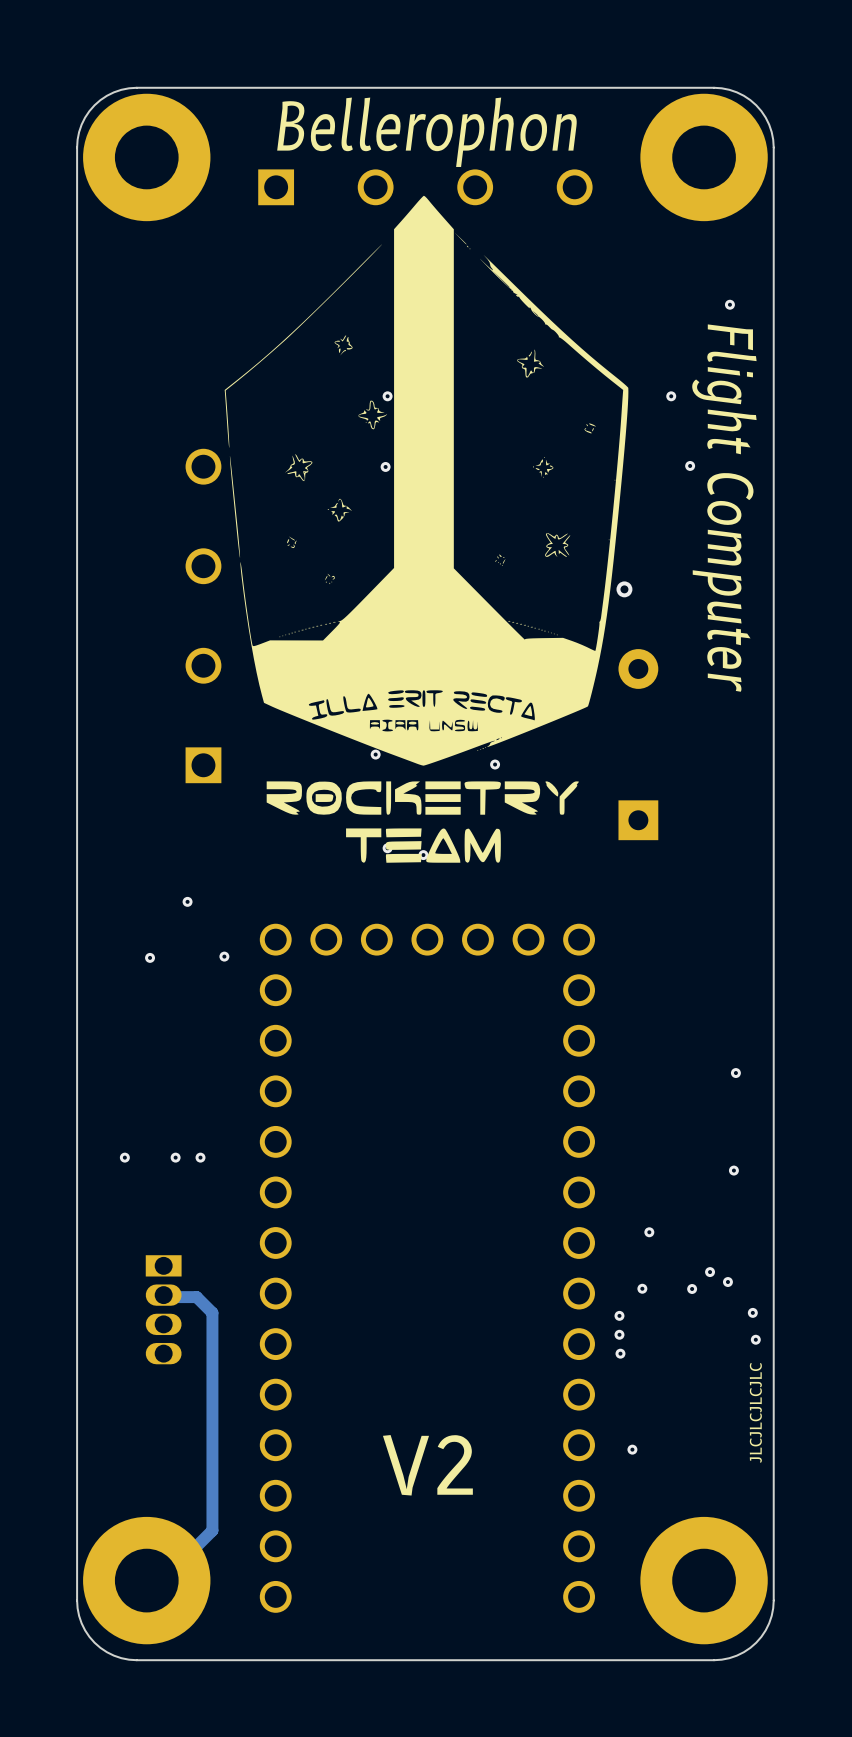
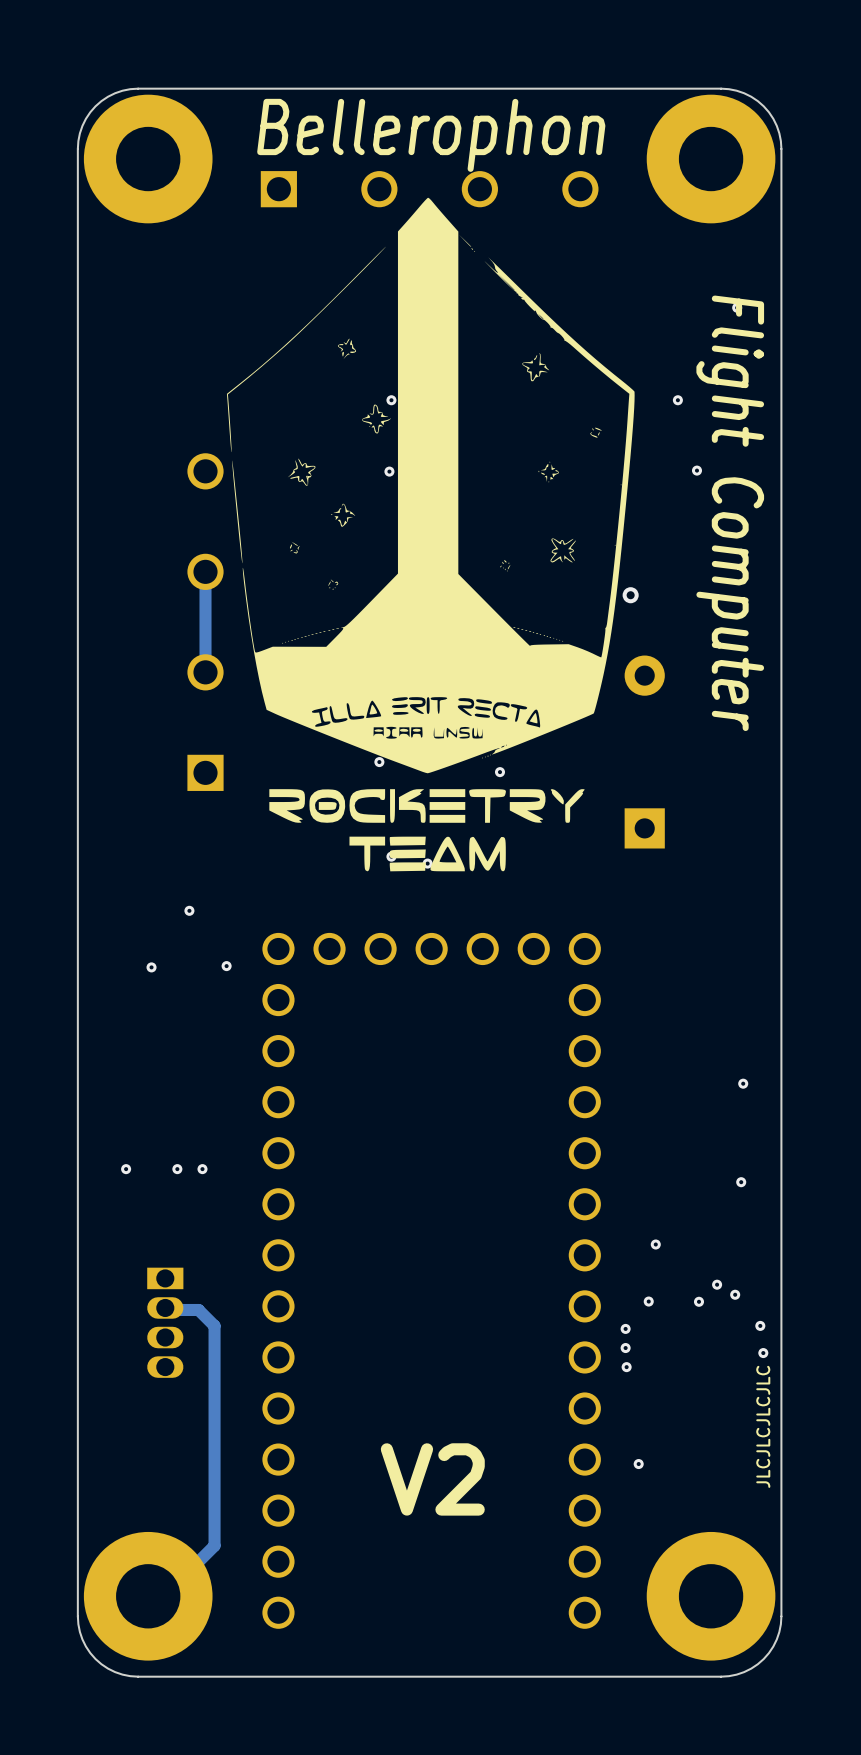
track: none -> (205, 571) (205, 672)

